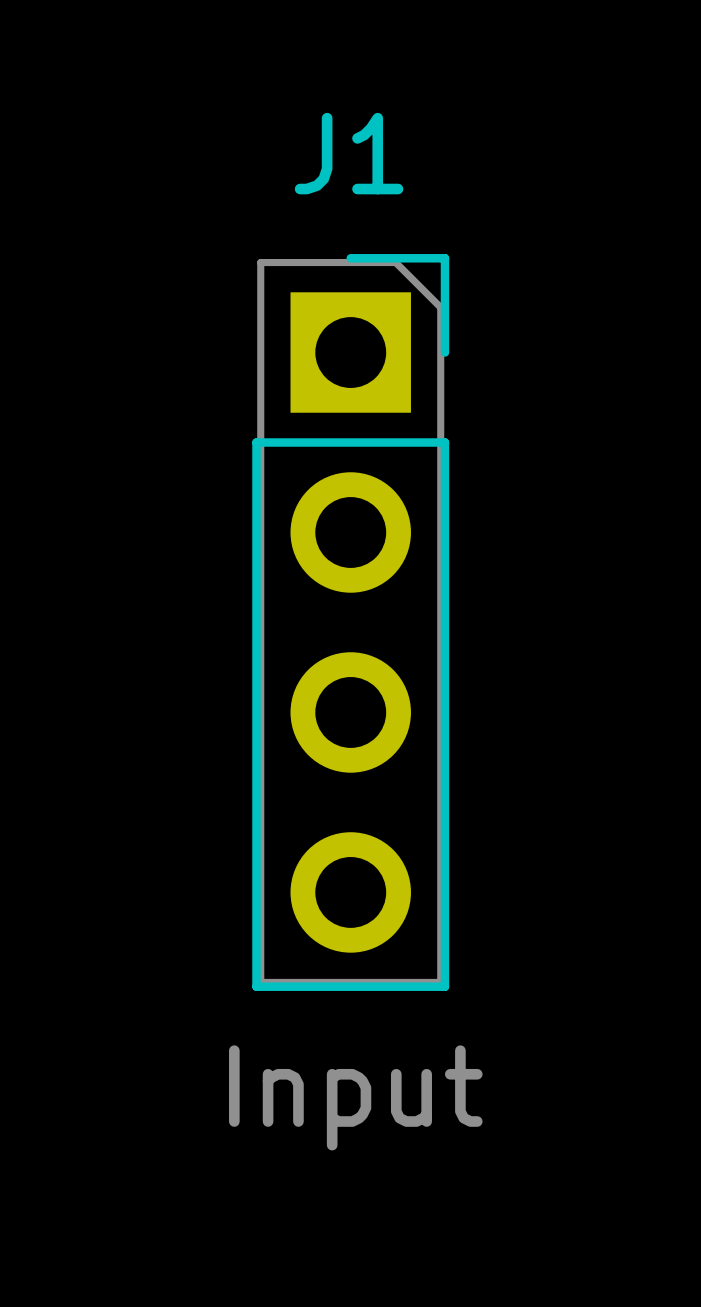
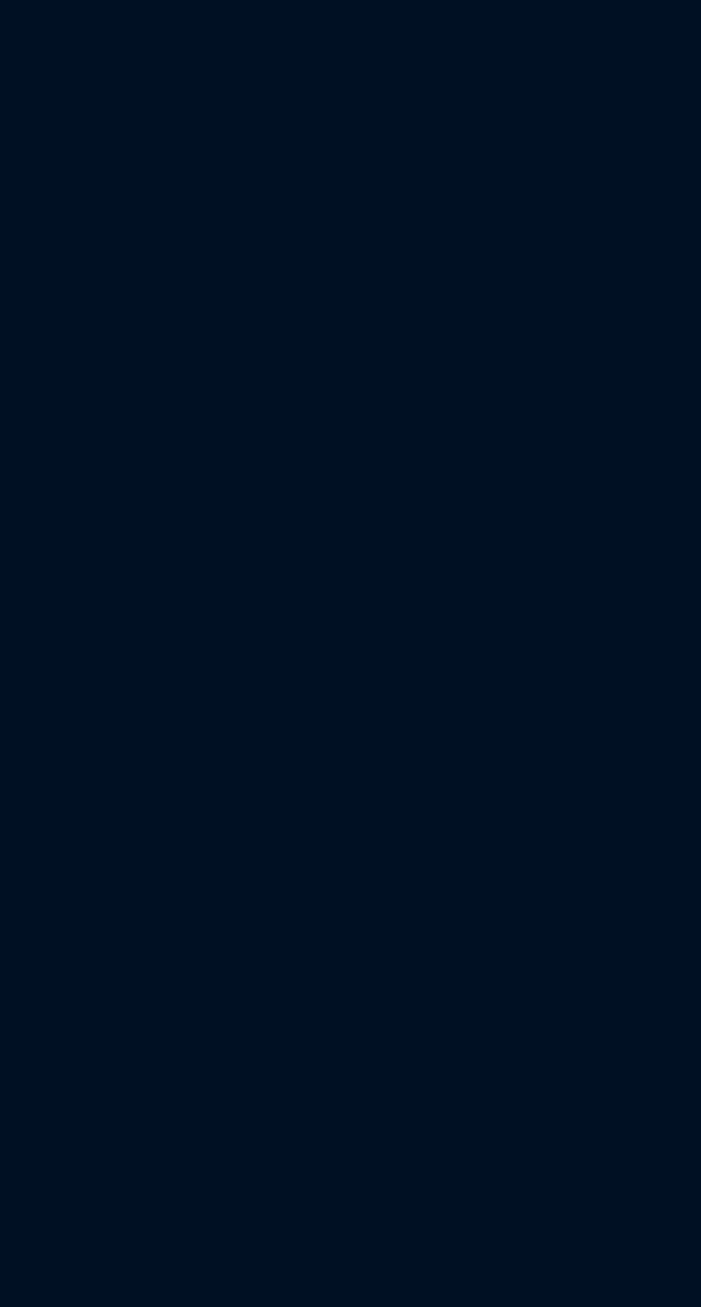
J1: Input (350, 622) -> none

